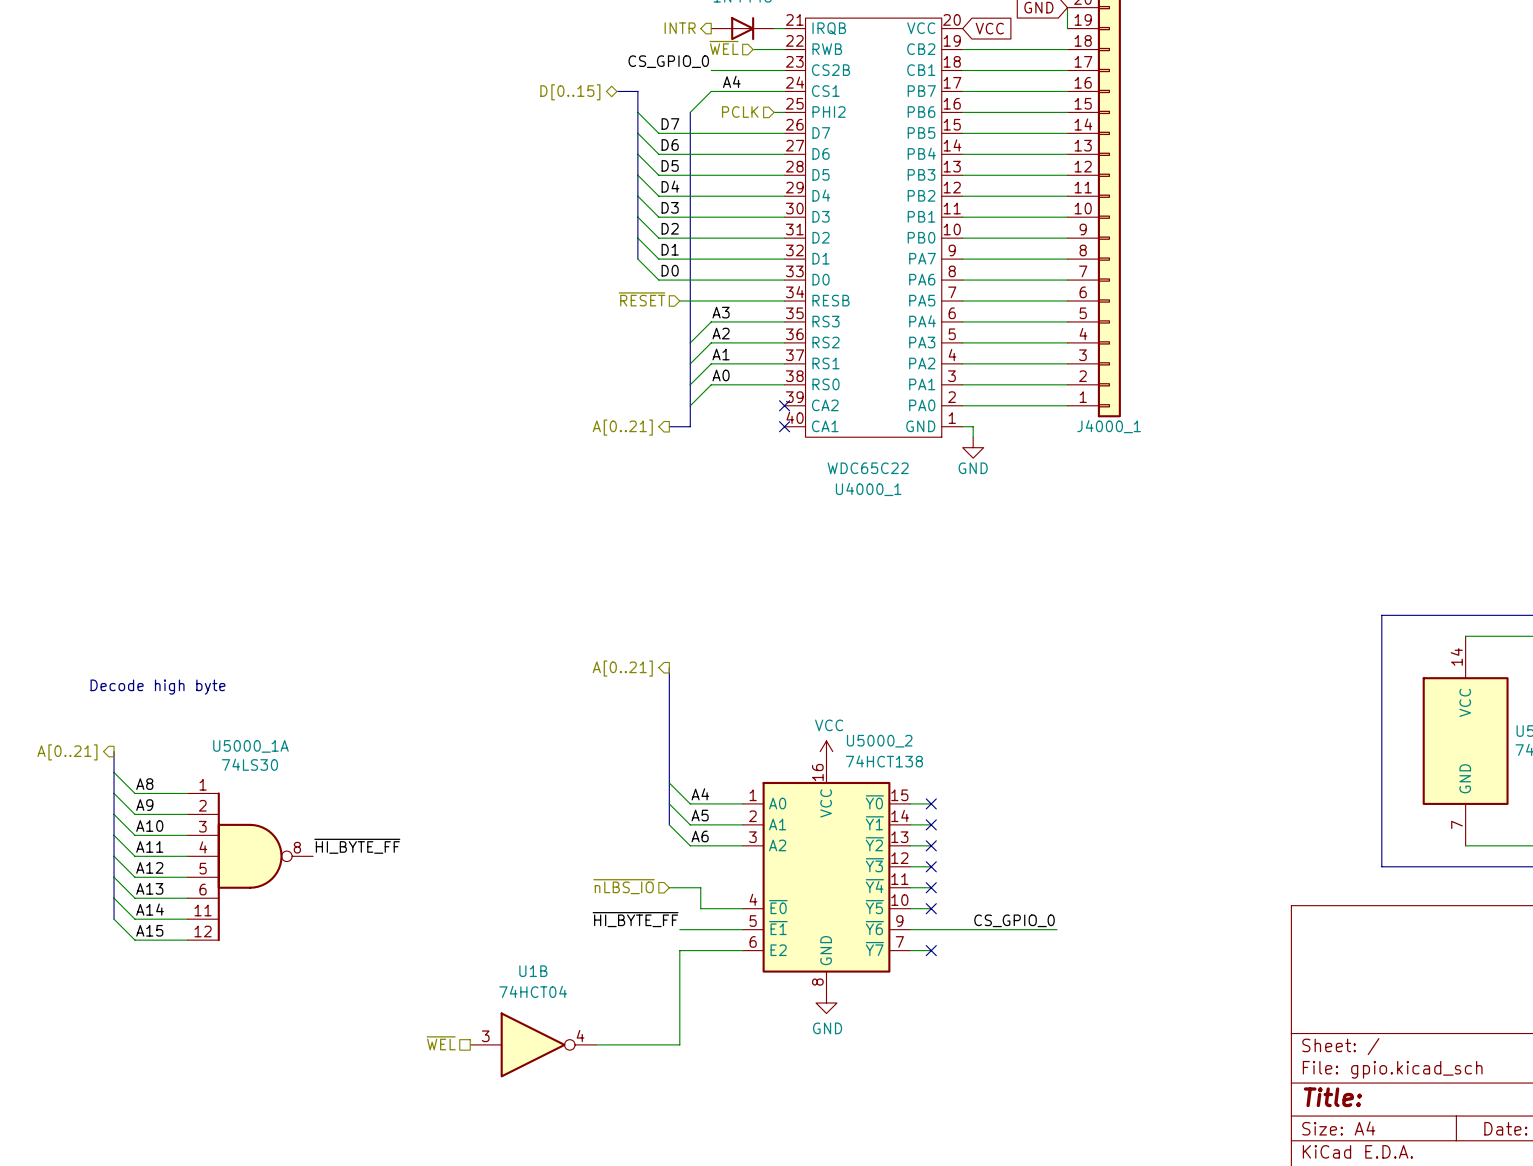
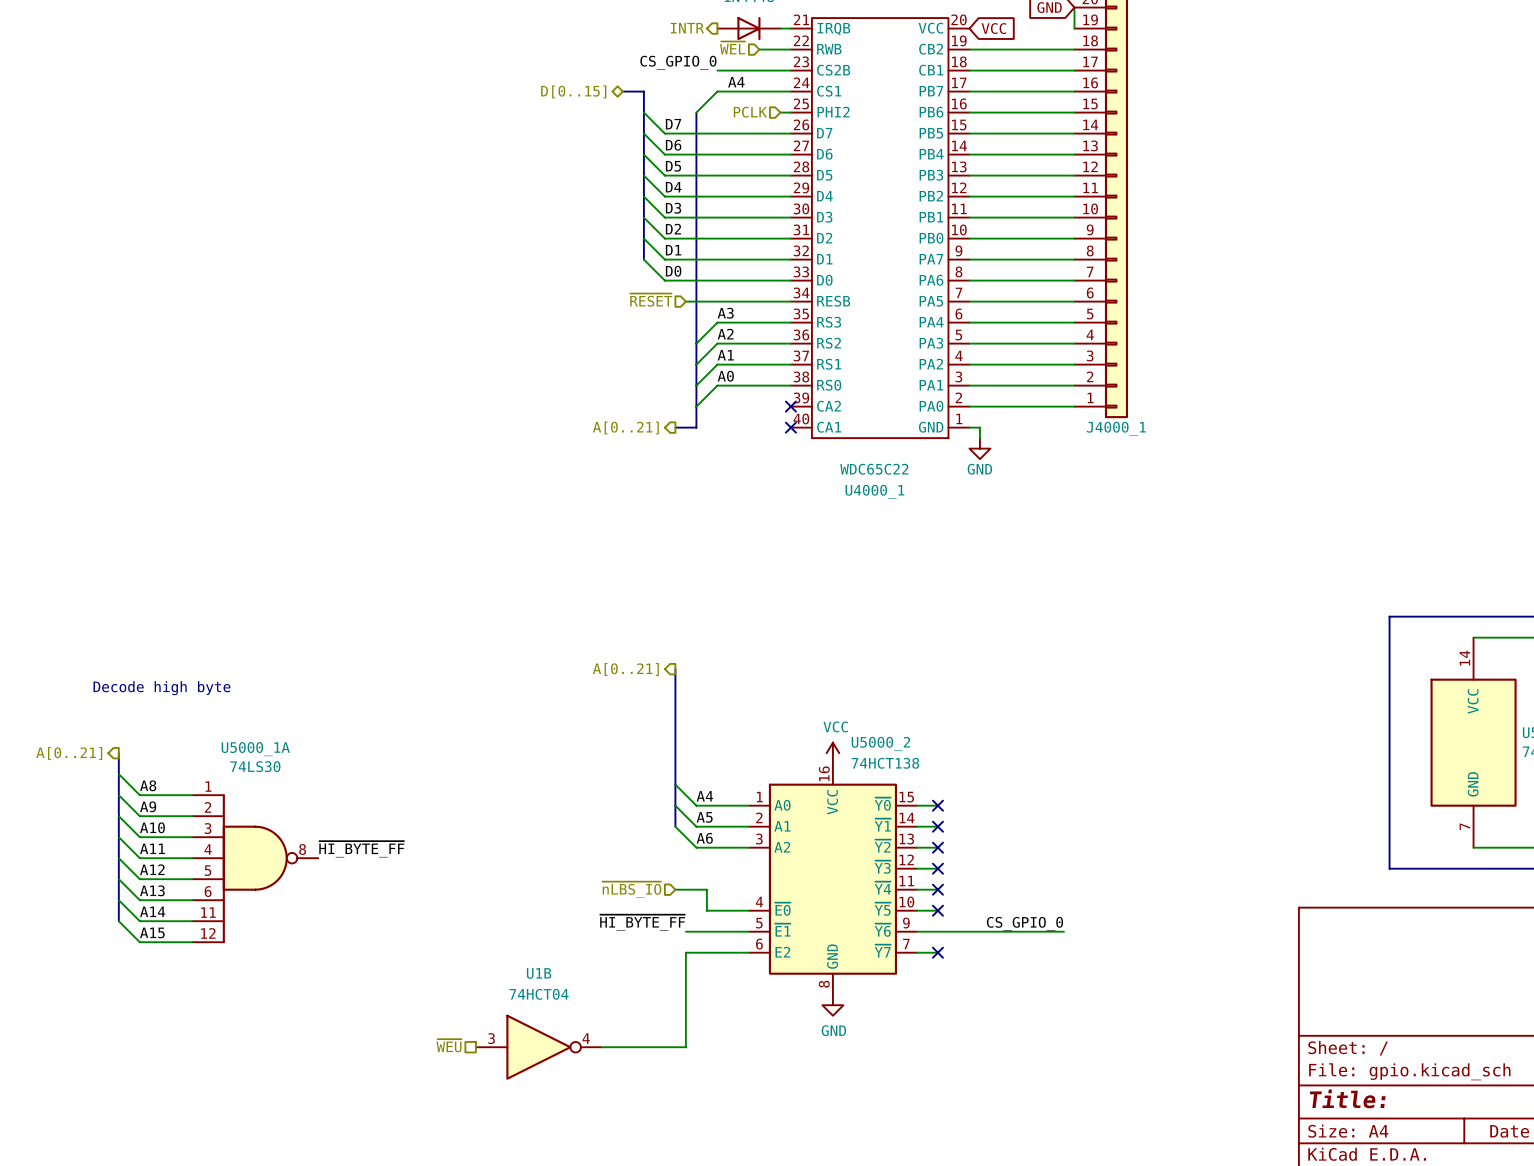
hierarchical label: ~{WEL} (441, 1043) -> ~{WEU} (449, 1045)

